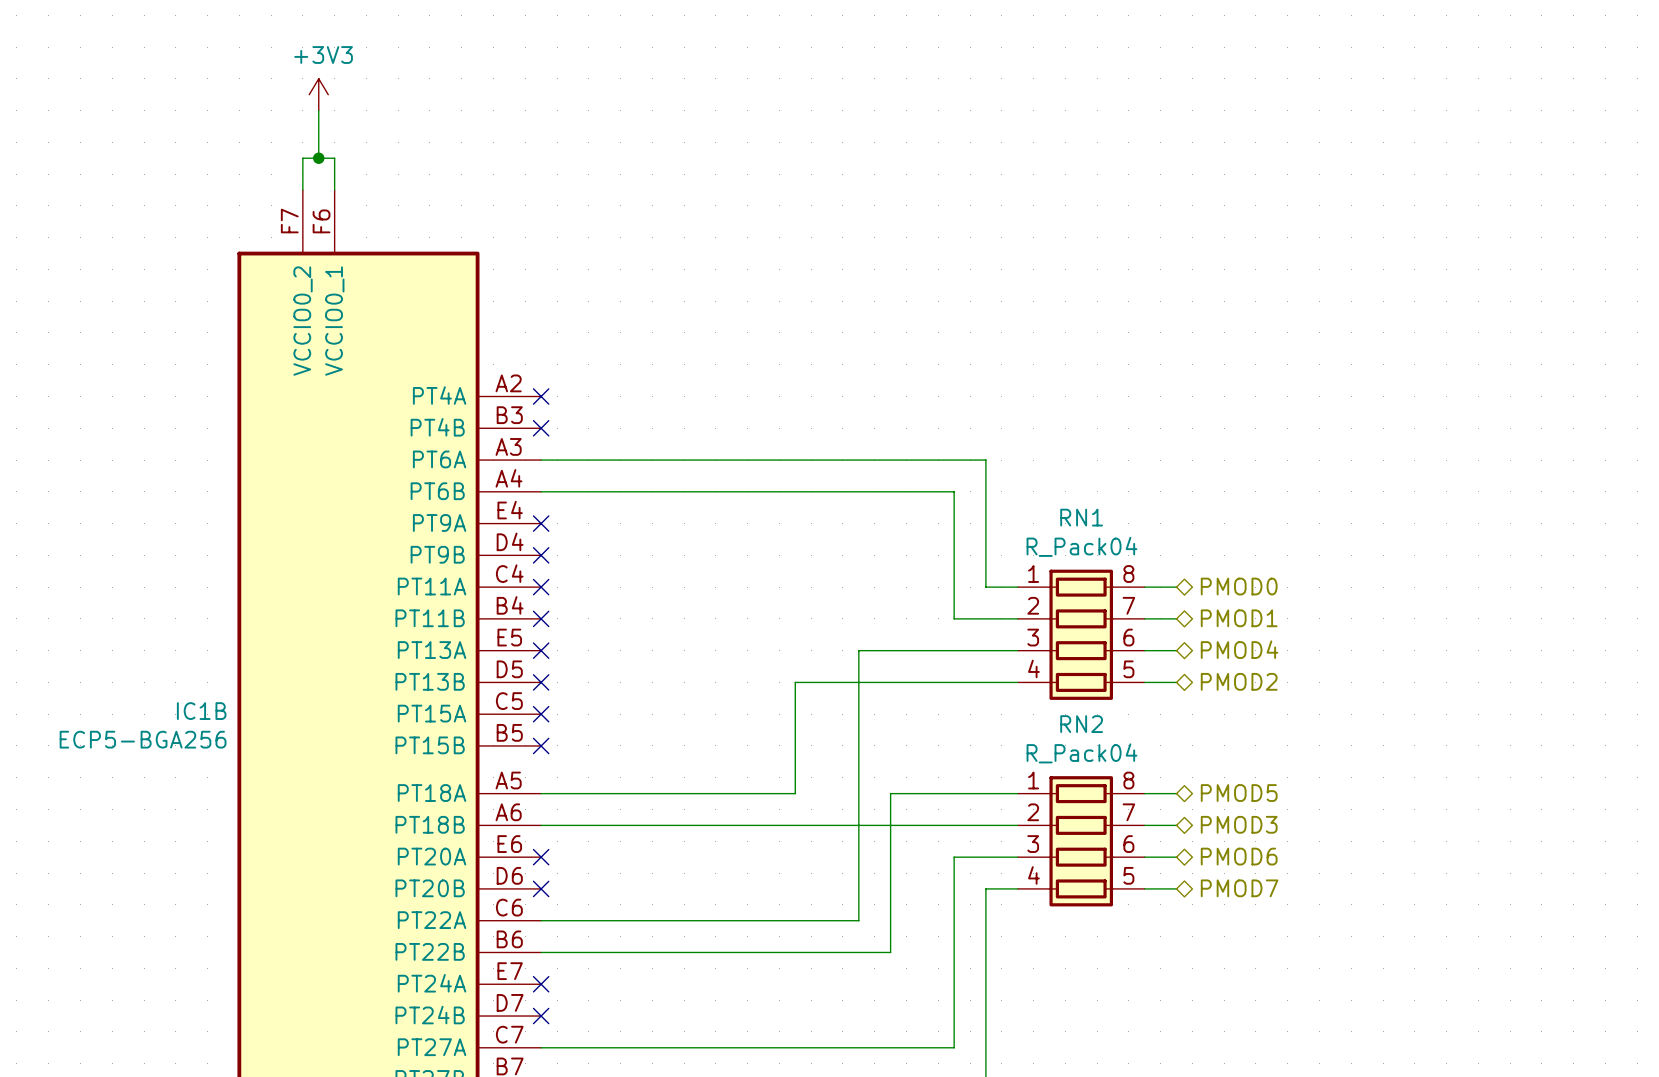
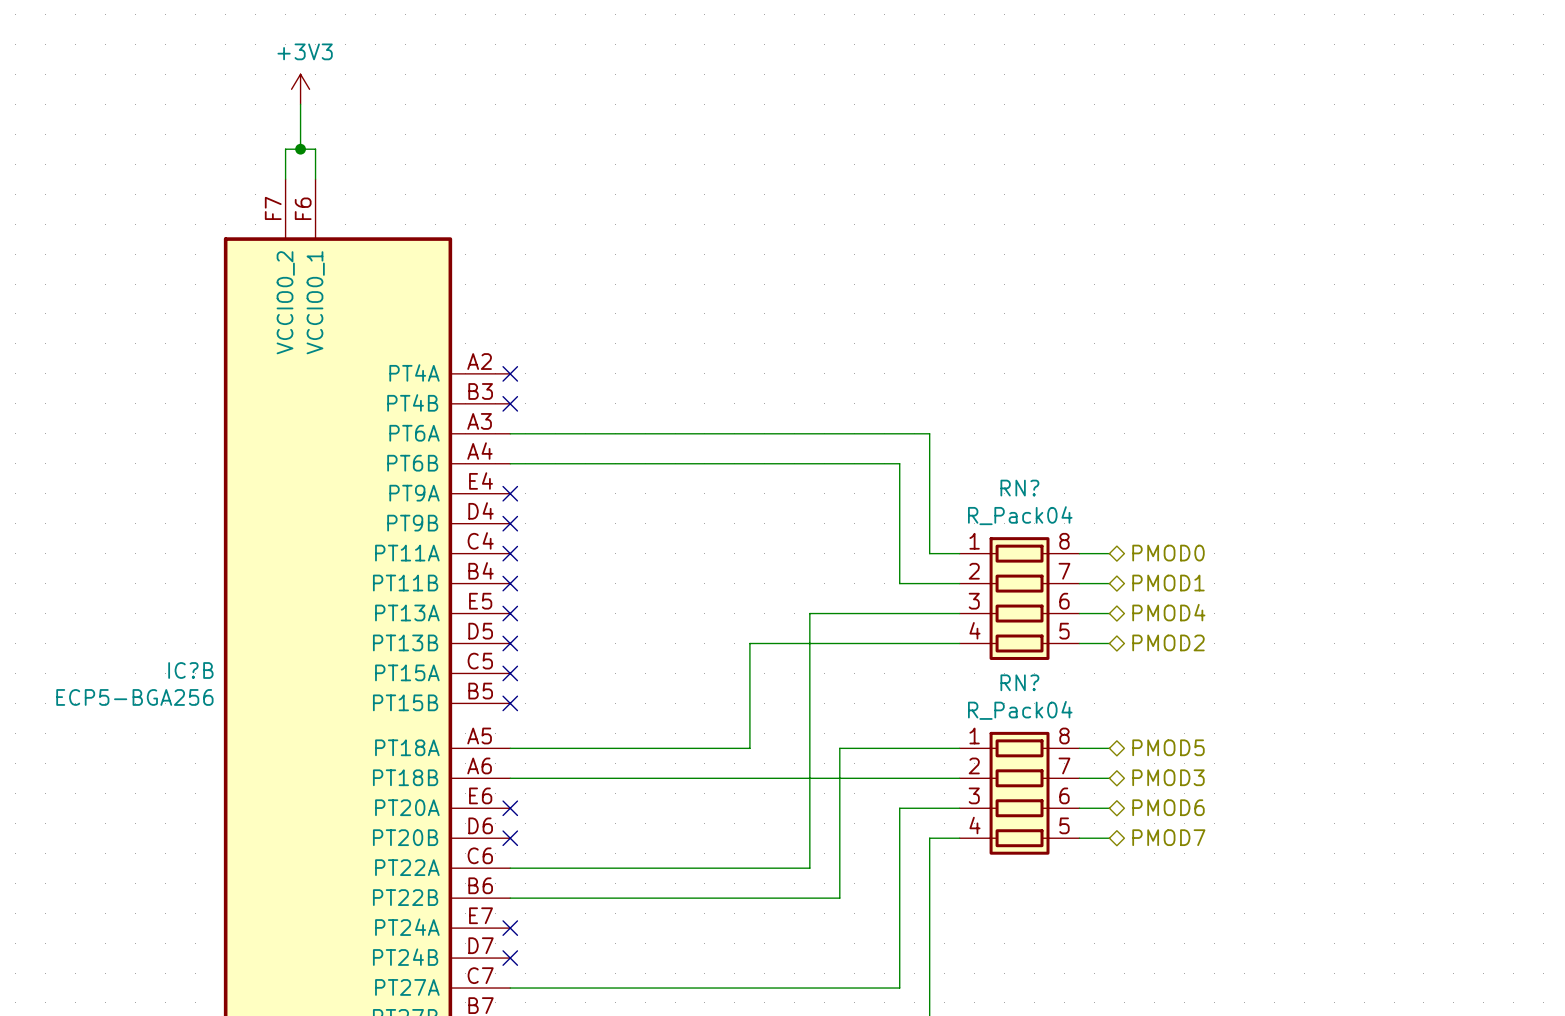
RN1 name: RN1 (1081, 517) -> RN? (1019, 488)
IC1B name: IC1B (201, 711) -> IC?B (190, 670)
RN2 name: RN2 (1081, 724) -> RN? (1019, 682)

